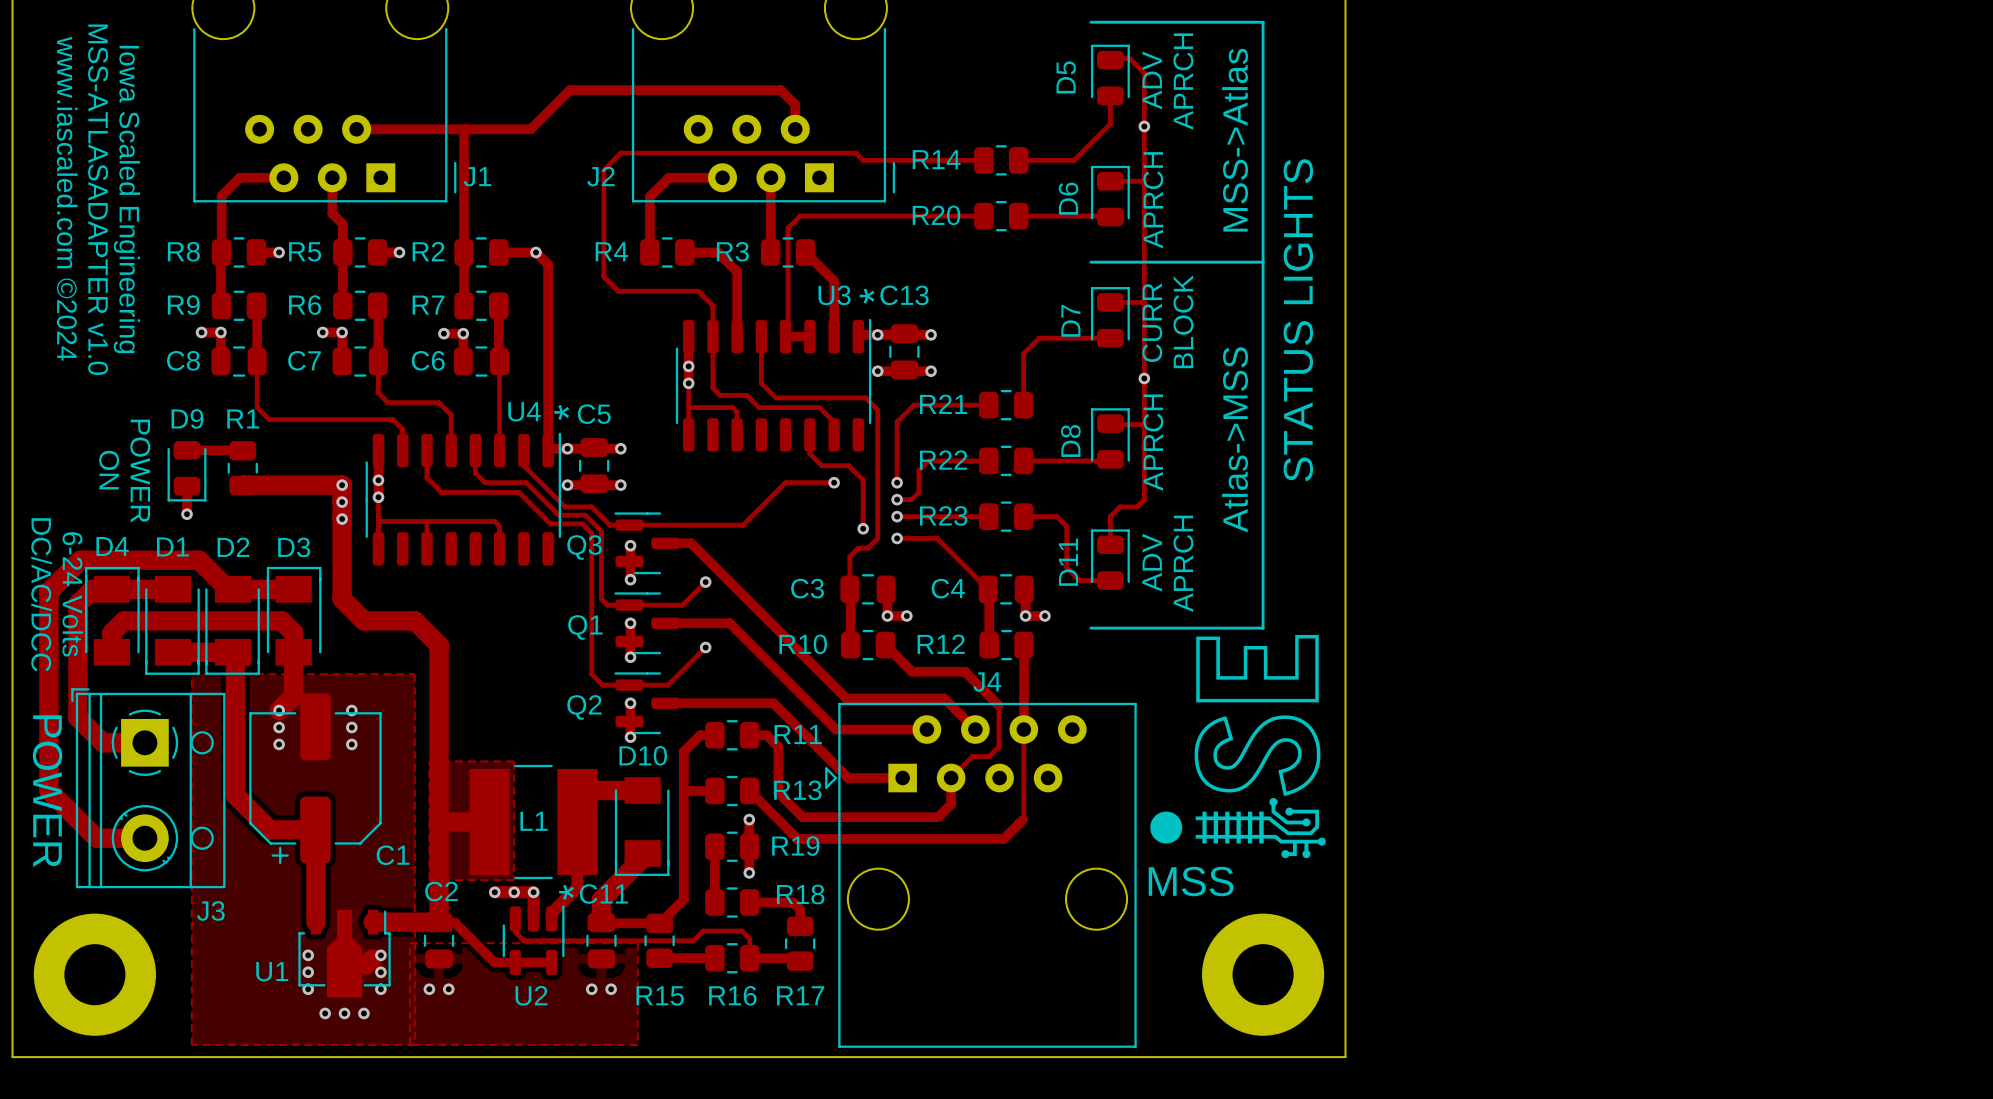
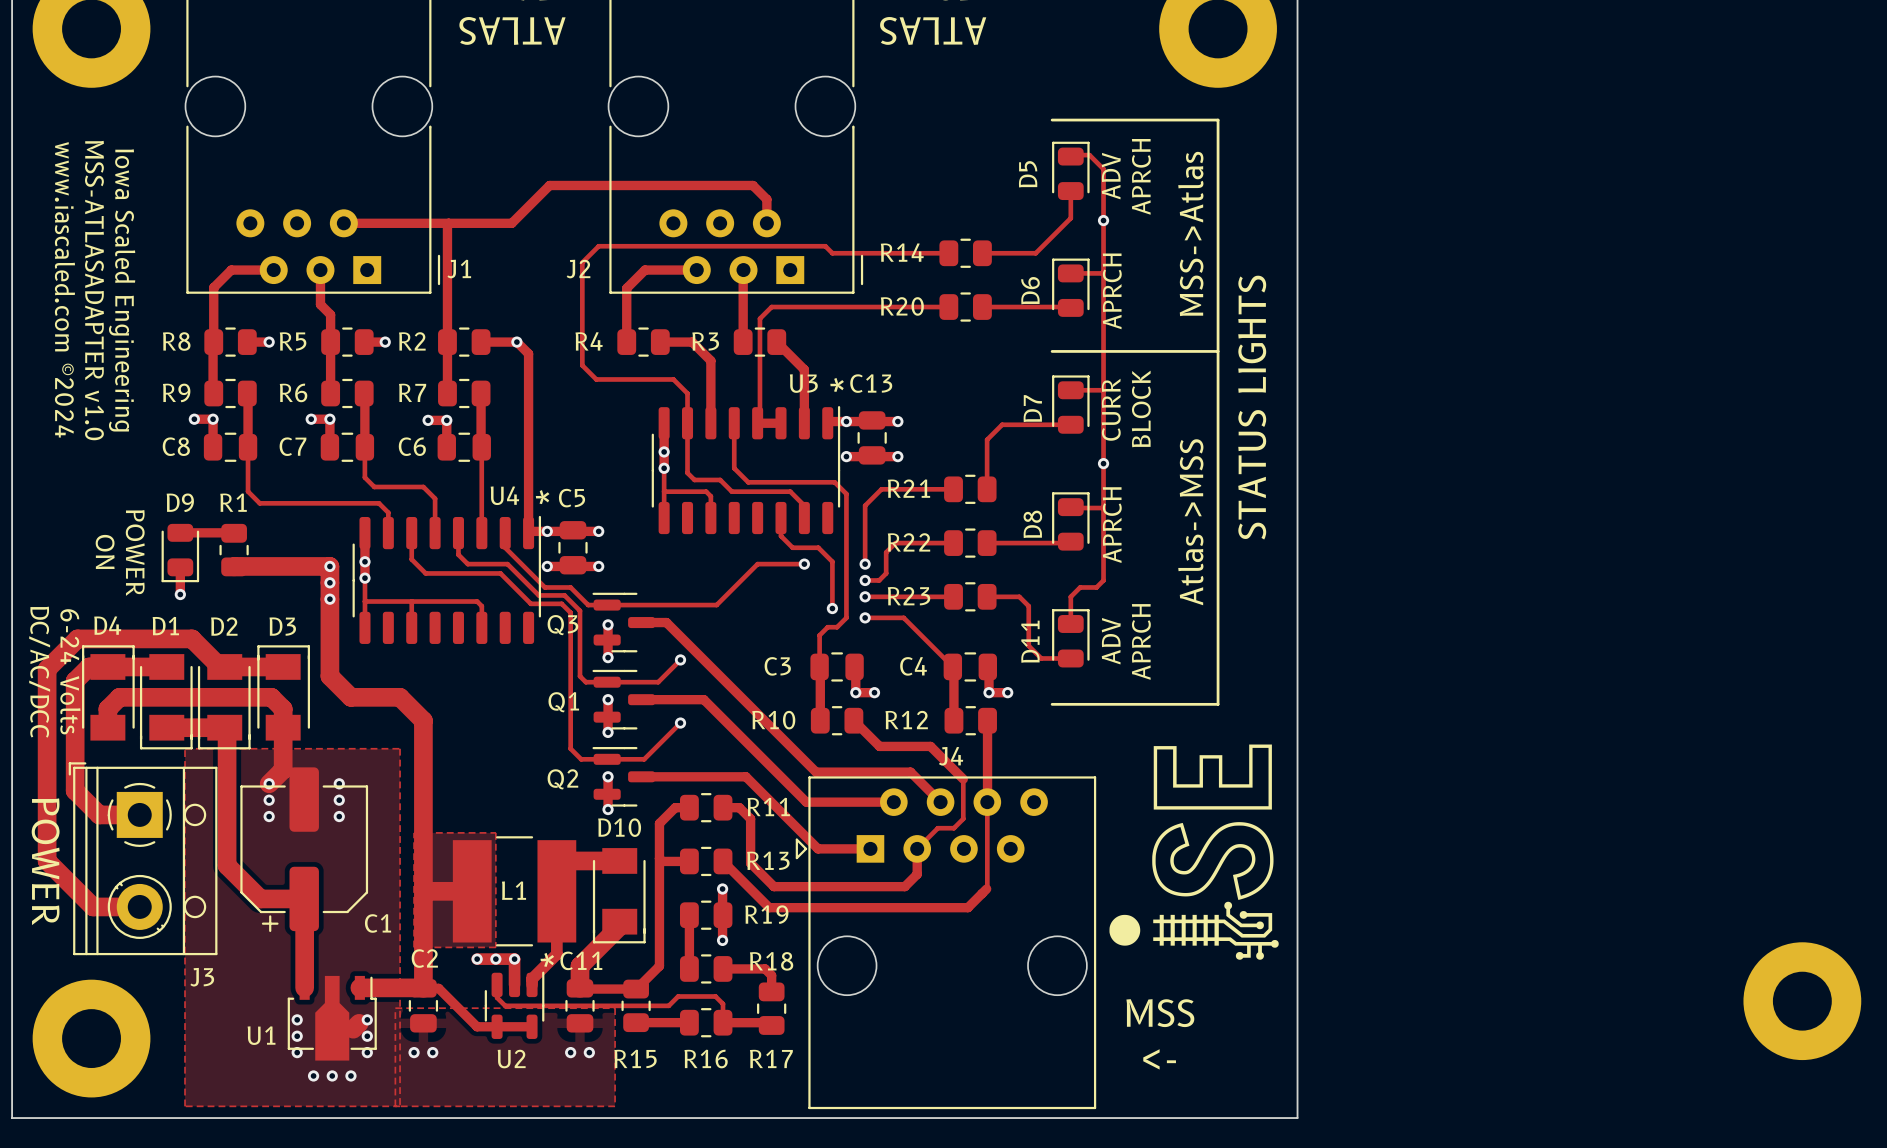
drawing position: (1257, 668) -> (1212, 777)
drawing position: (1257, 755) -> (1212, 861)
drawing position: (1289, 812) -> (1244, 915)
drawing position: (1166, 827) -> (1124, 930)
drawing position: (1260, 832) -> (1215, 935)
text position: MSS (1191, 881) -> MSS (1160, 1013)
part: none -> (1802, 1001)
part: (1263, 974) -> none
text: none -> <- (1159, 1059)

